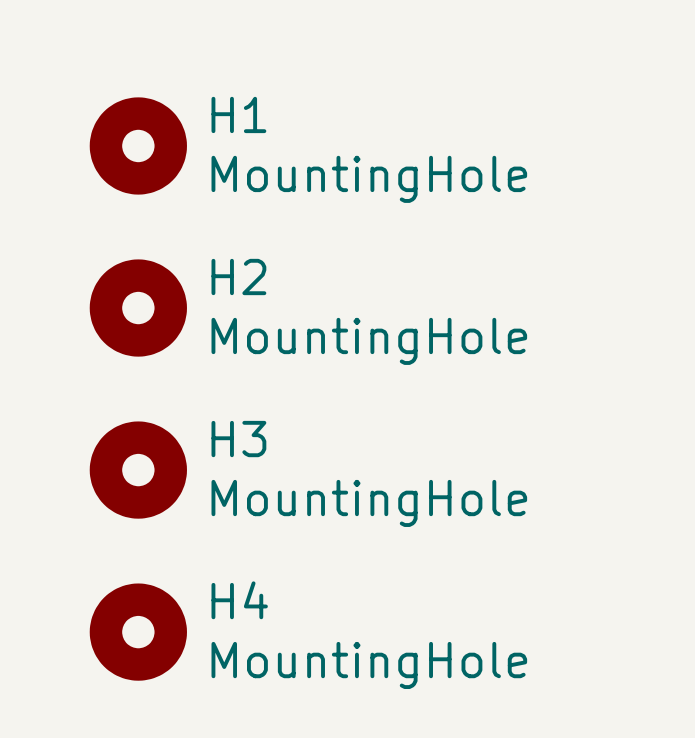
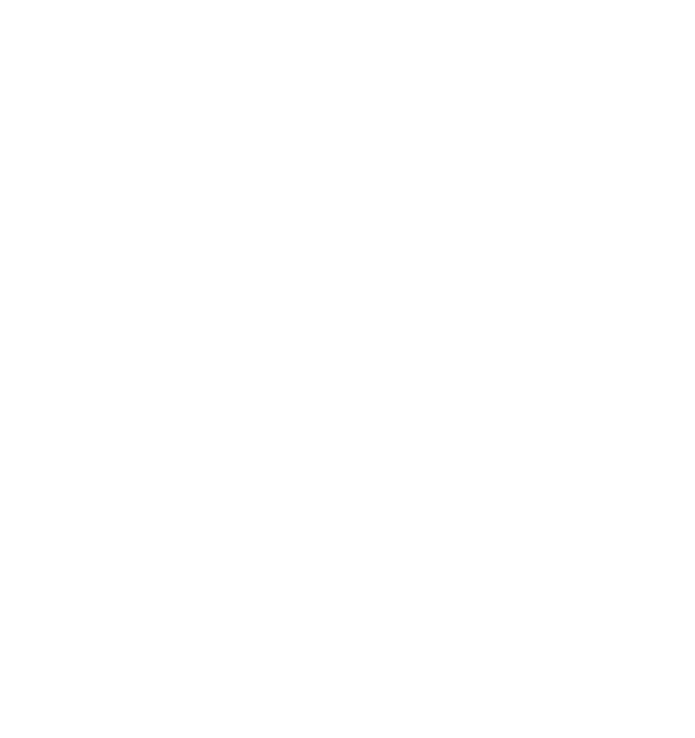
H1: MountingHole (138, 145) -> none
H2: MountingHole (138, 308) -> none
H3: MountingHole (138, 470) -> none
H4: MountingHole (138, 632) -> none

